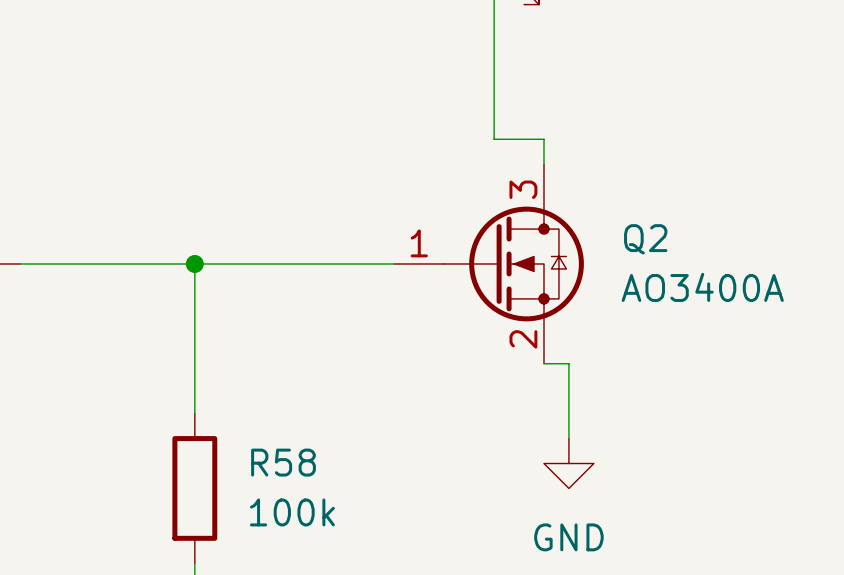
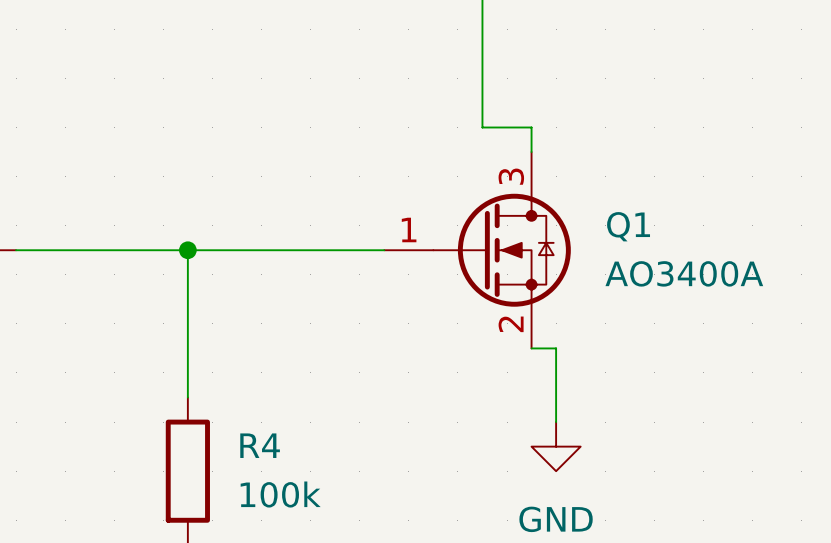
Q2 name: Q2 (645, 239) -> Q1 (628, 226)
R58 name: R58 (283, 462) -> R4 (260, 445)

